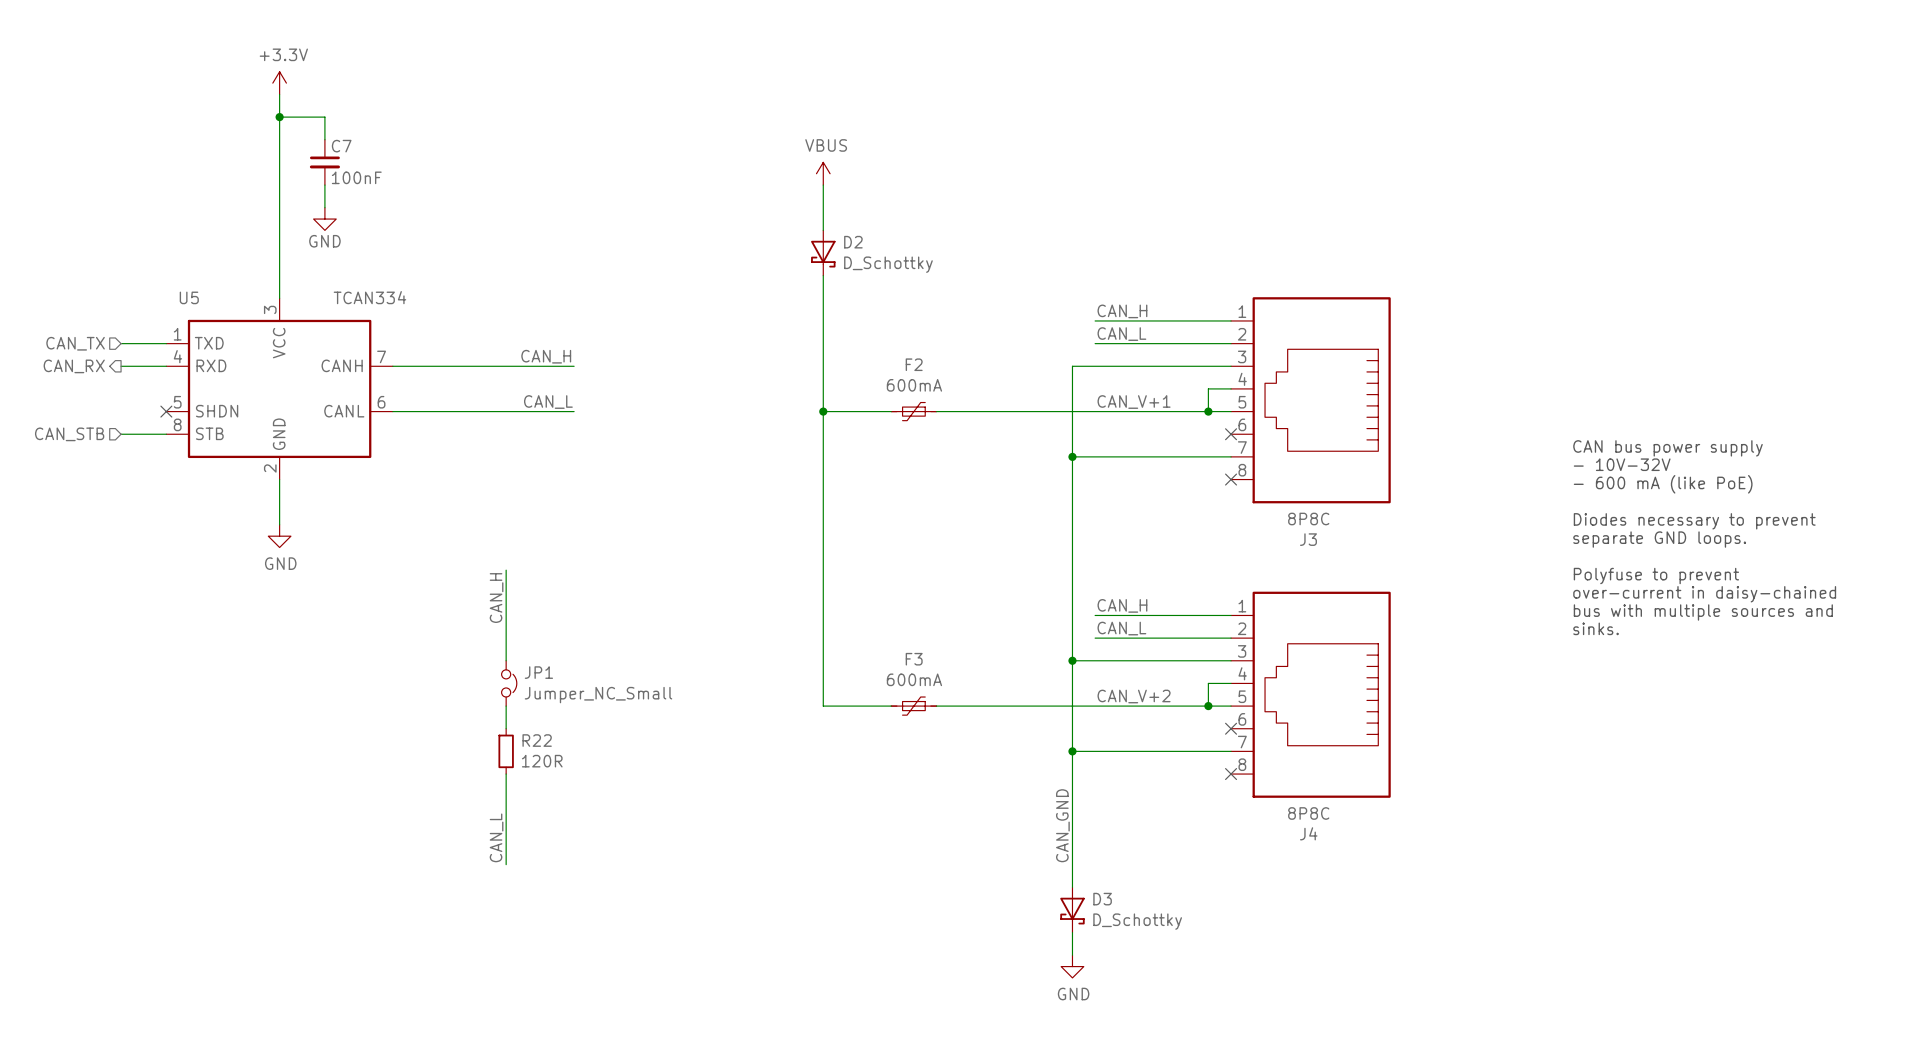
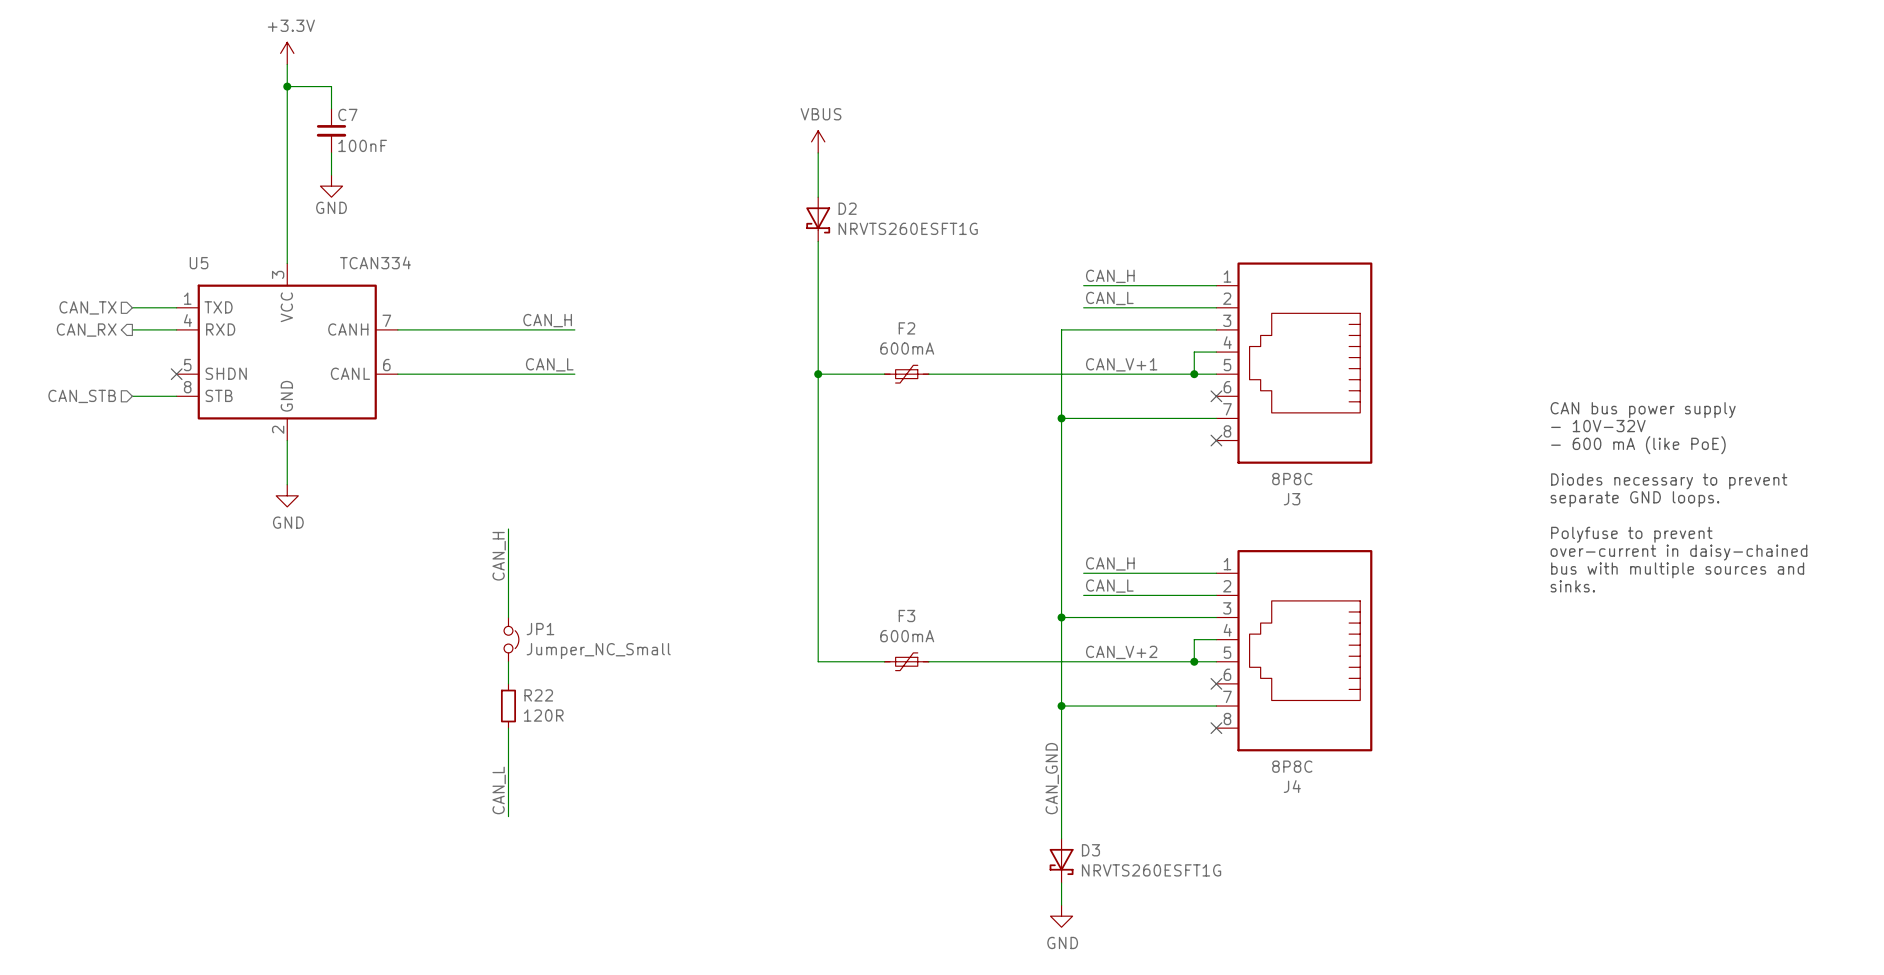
D2 value: D_Schottky (888, 264) -> NRVTS260ESFT1G (908, 228)
D3 value: D_Schottky (1137, 921) -> NRVTS260ESFT1G (1151, 870)

